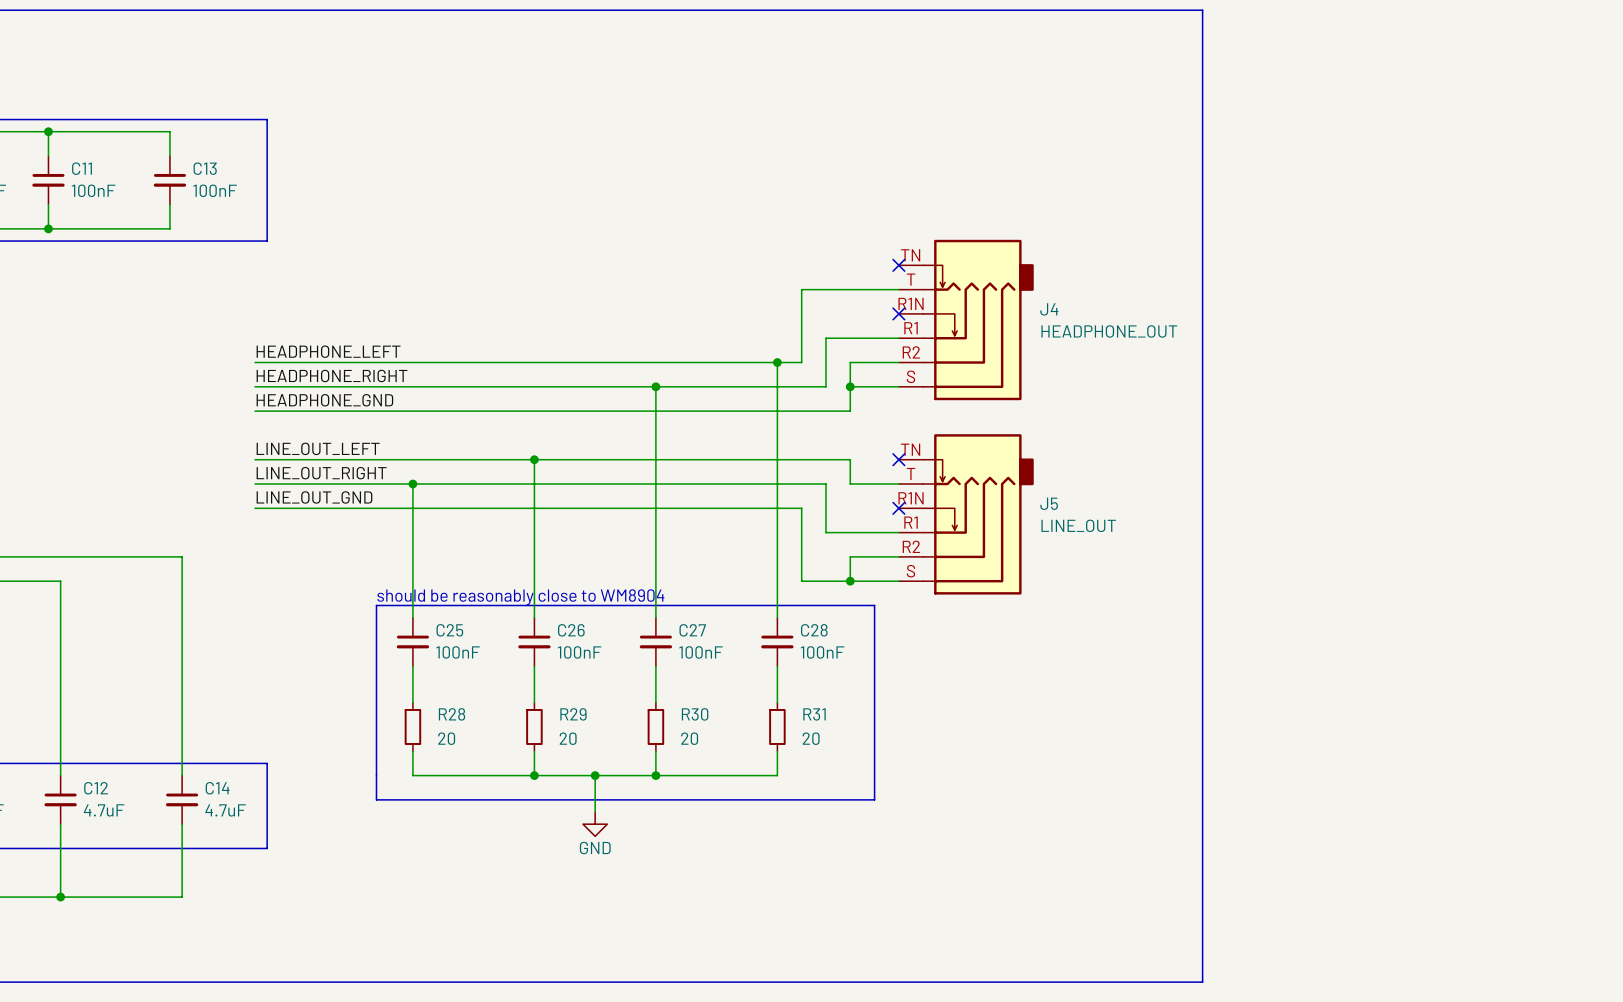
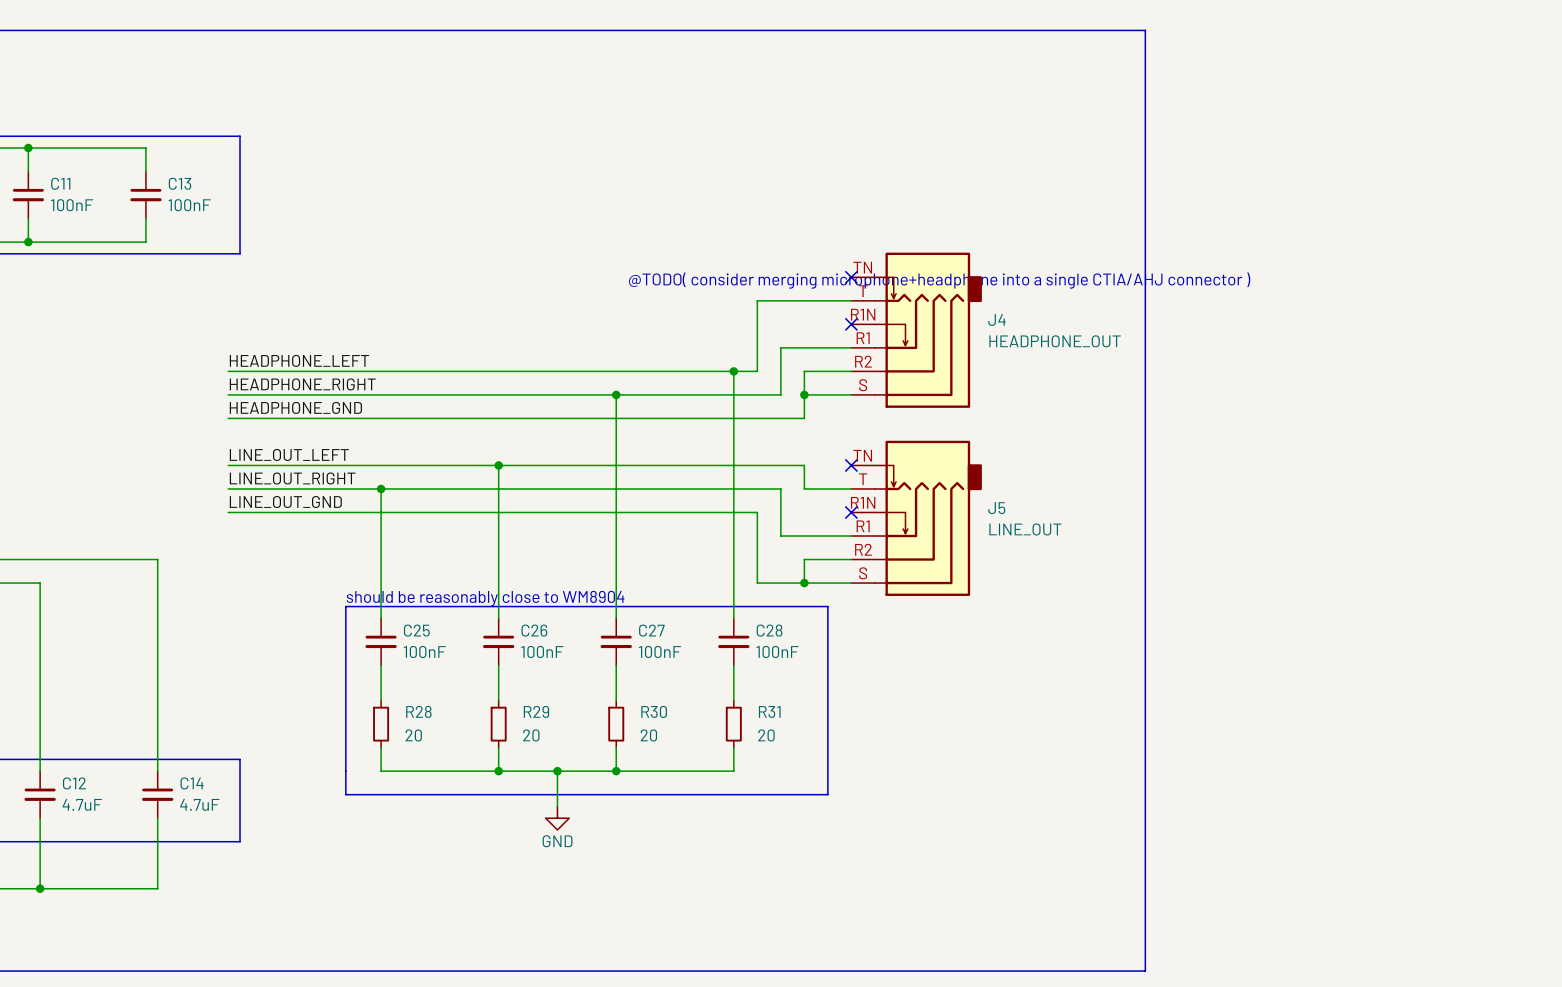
text: none -> @TODO( consider merging microphone+headphone into a single CTIA/AHJ connector ) (939, 280)

